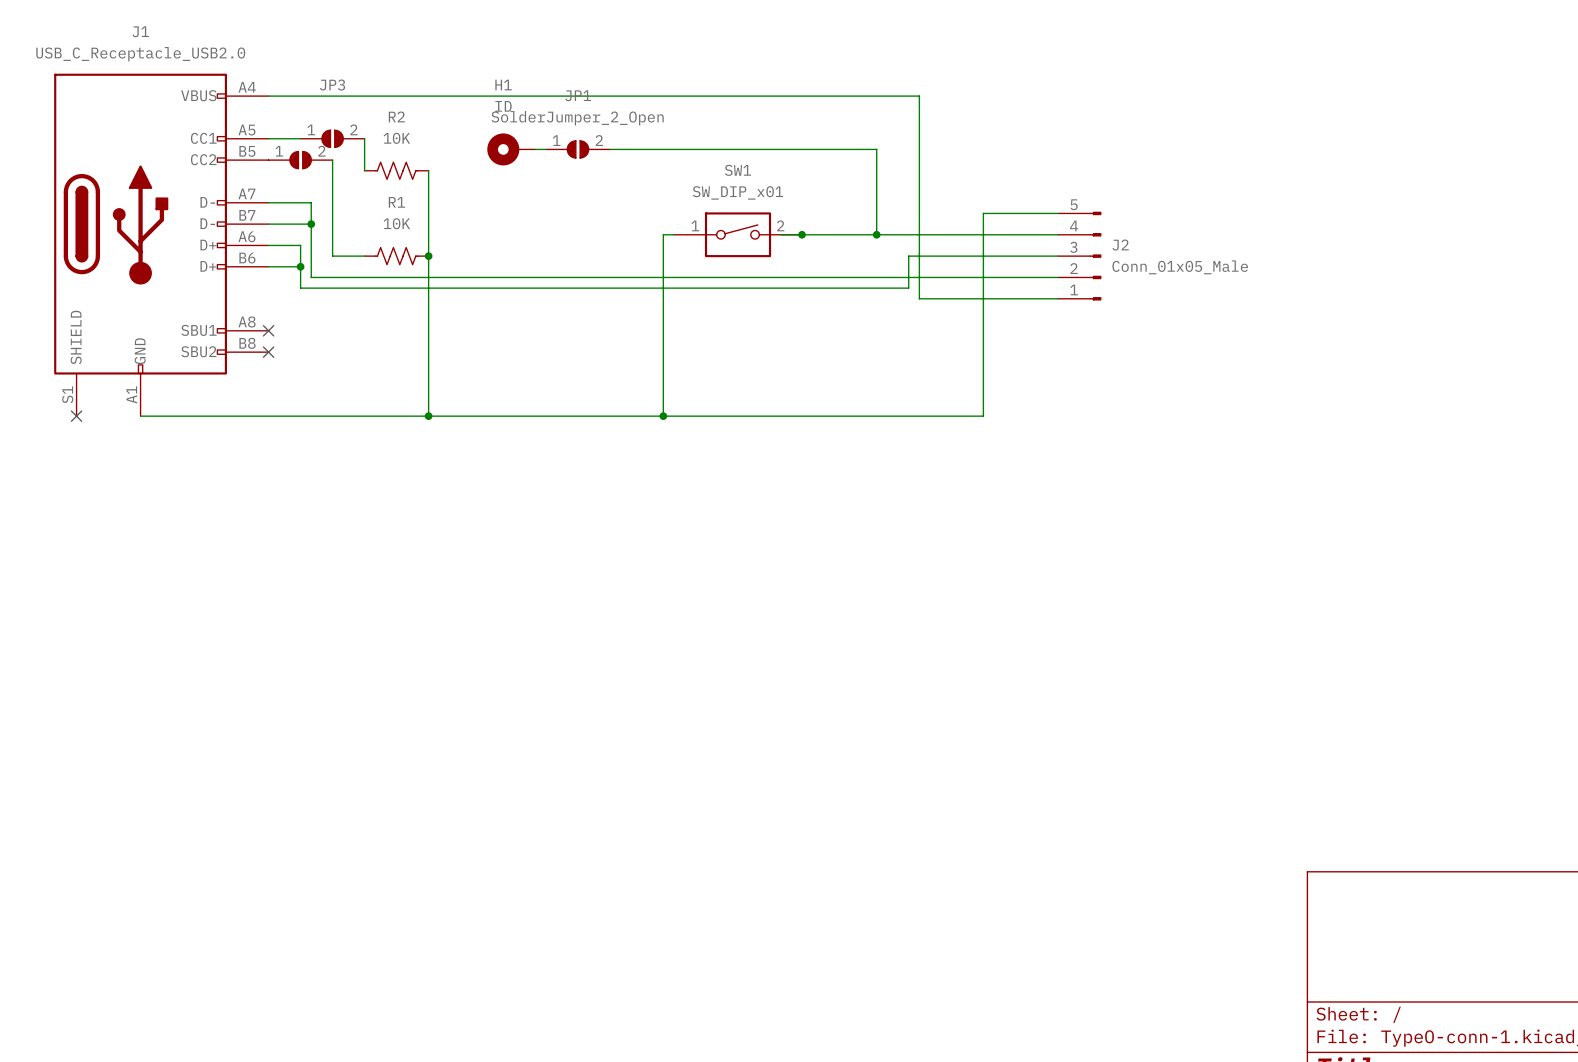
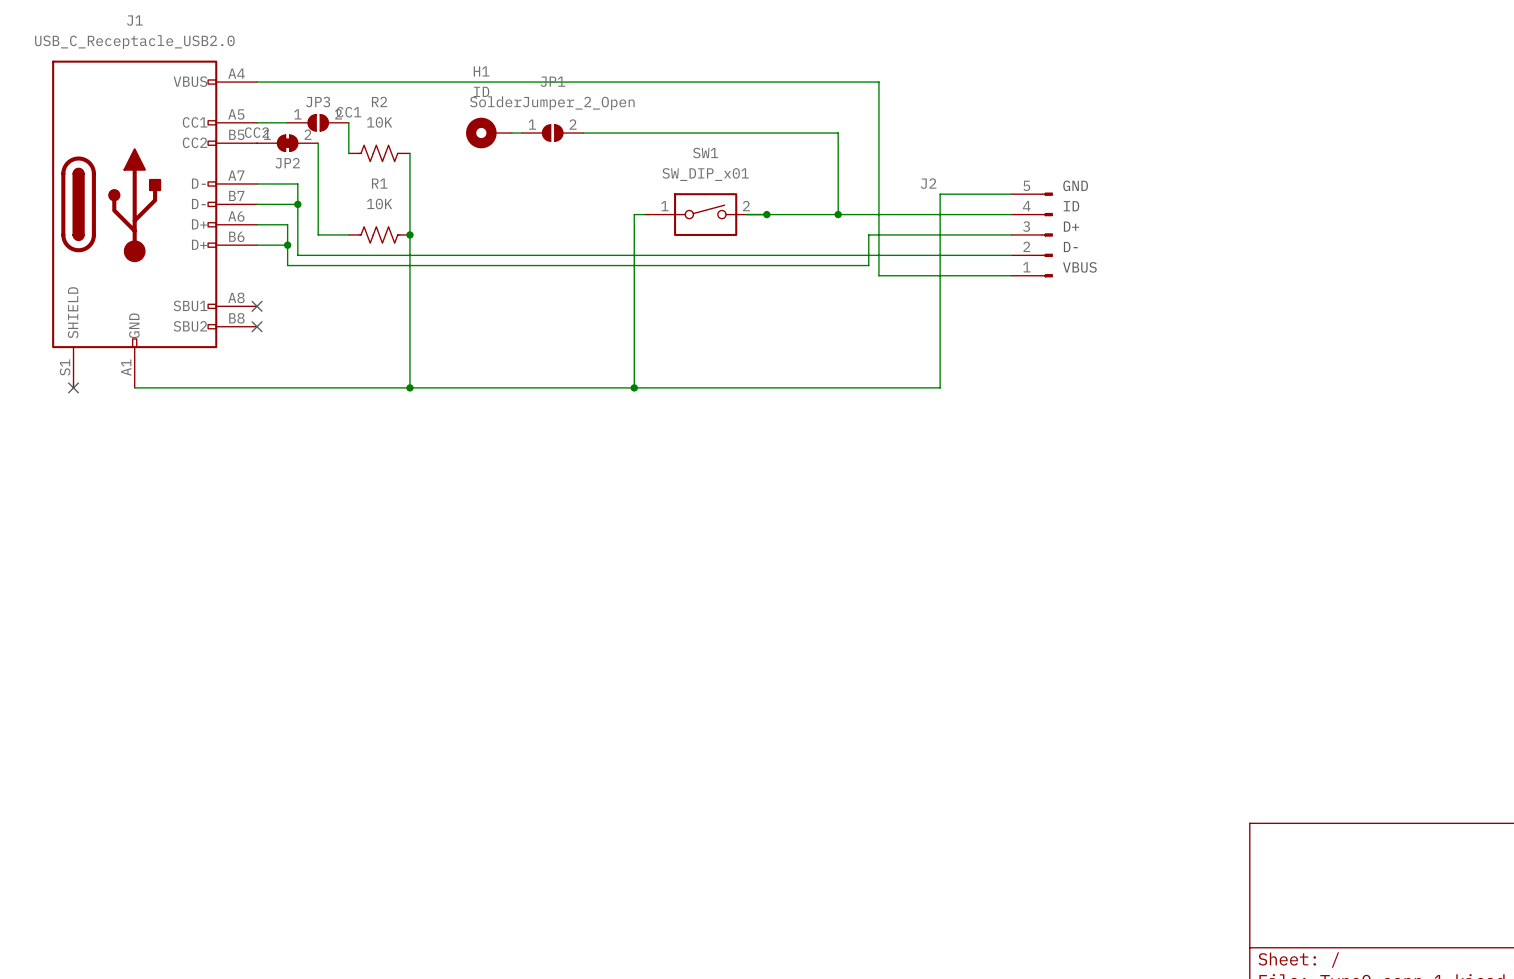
JP3 name position: JP3 (332, 85) -> JP3 (318, 102)
JP3 value: none -> CC1 (348, 112)
part: (300, 160) -> none
JP2: none -> CC2 (287, 143)
text: none -> GND (1075, 185)
text: none -> ID (1071, 206)
J2 name position: J2 (1120, 245) -> J2 (928, 183)
text: none -> D+ (1071, 226)
J2 value: Conn_01x05_Male (1180, 267) -> none
text: none -> D- (1070, 247)
text: none -> VBUS (1079, 267)

